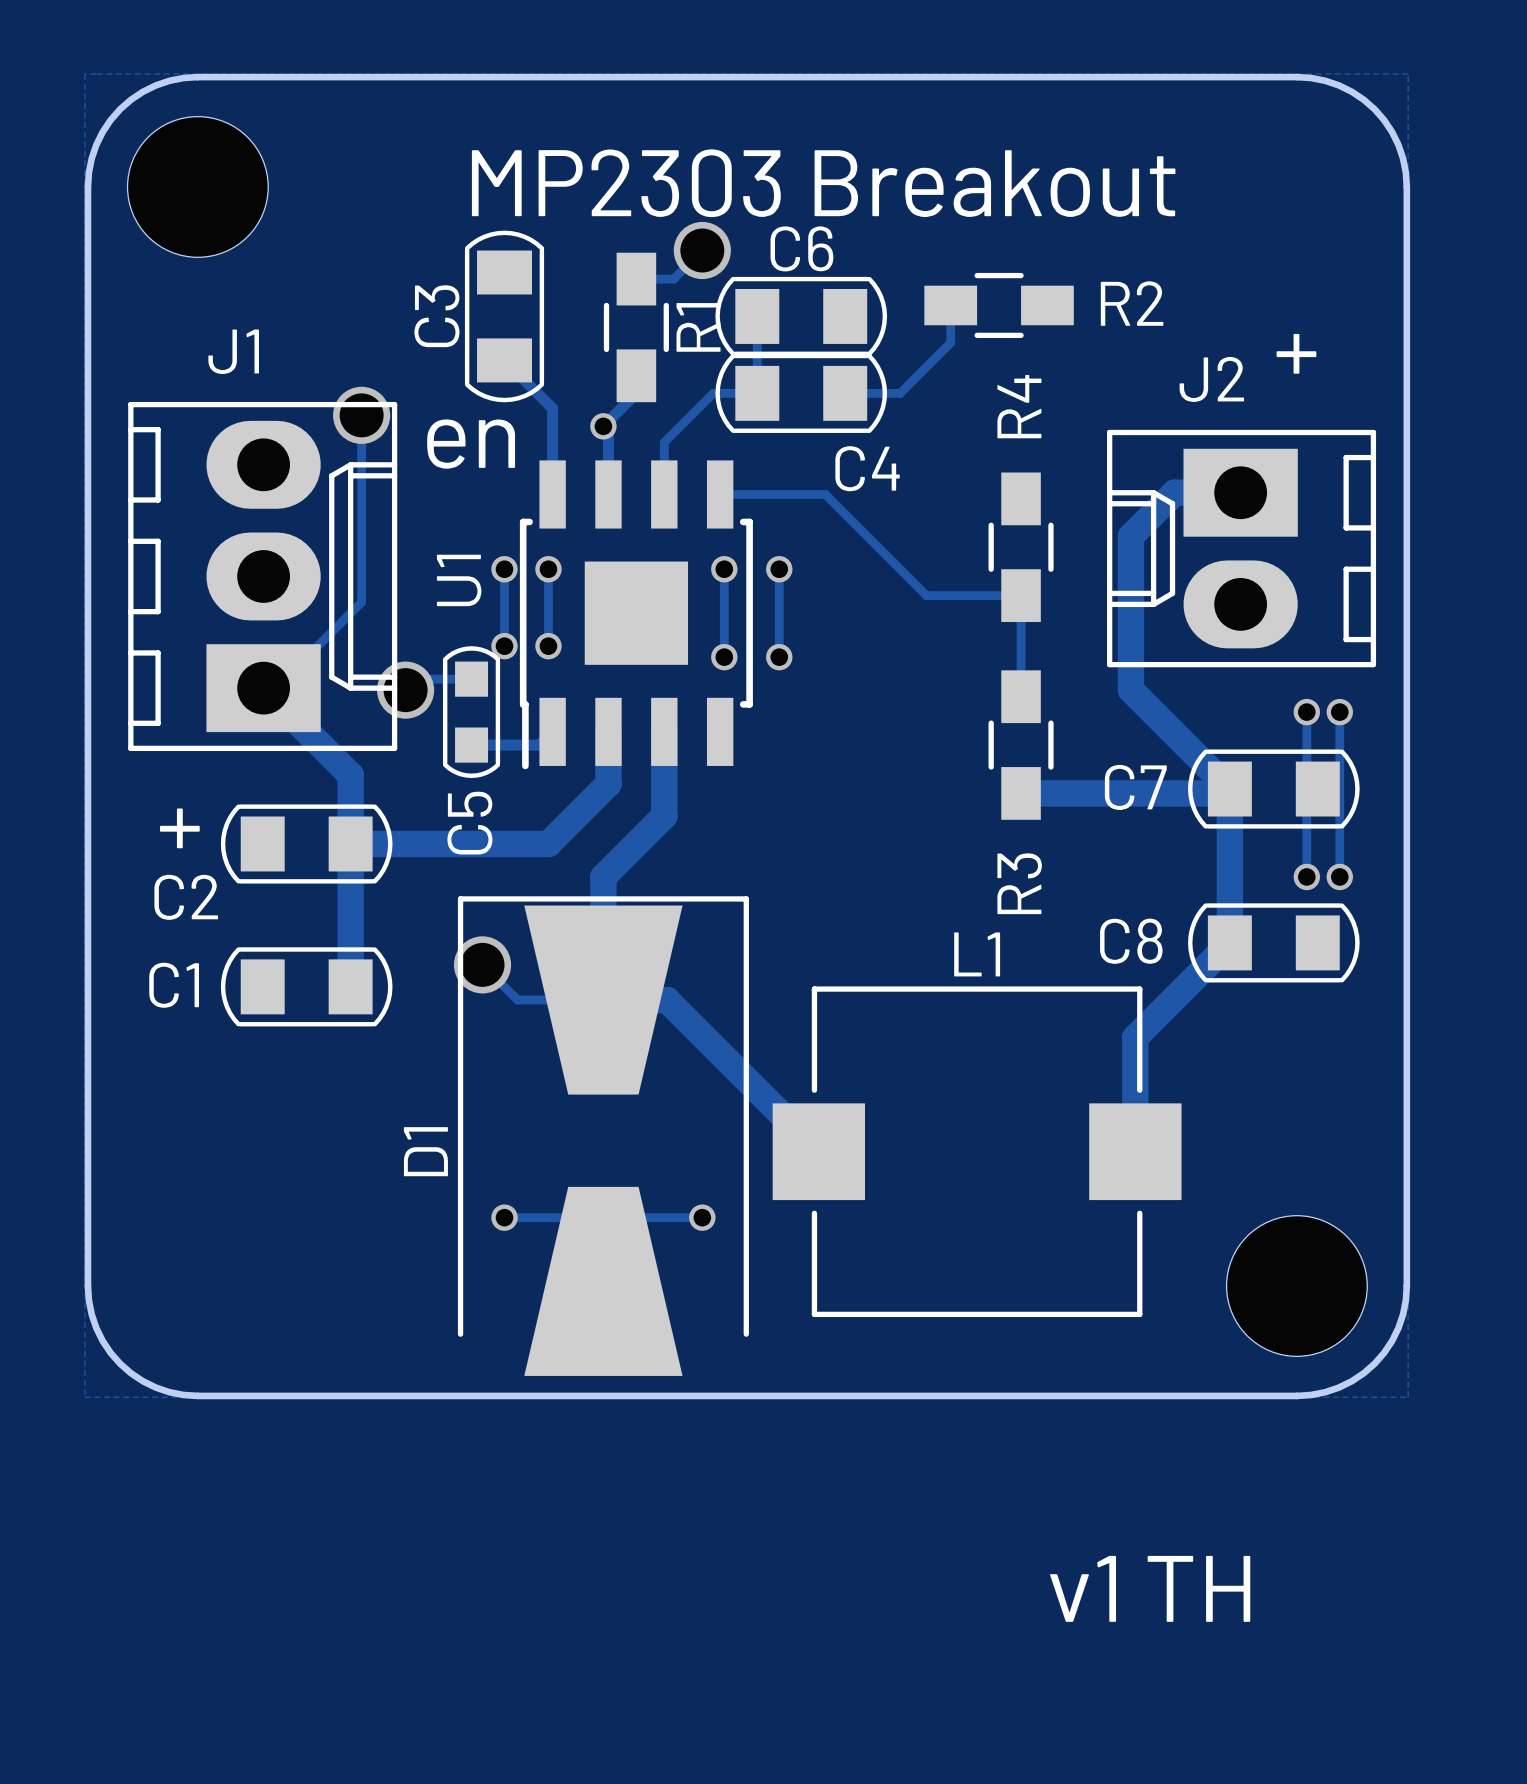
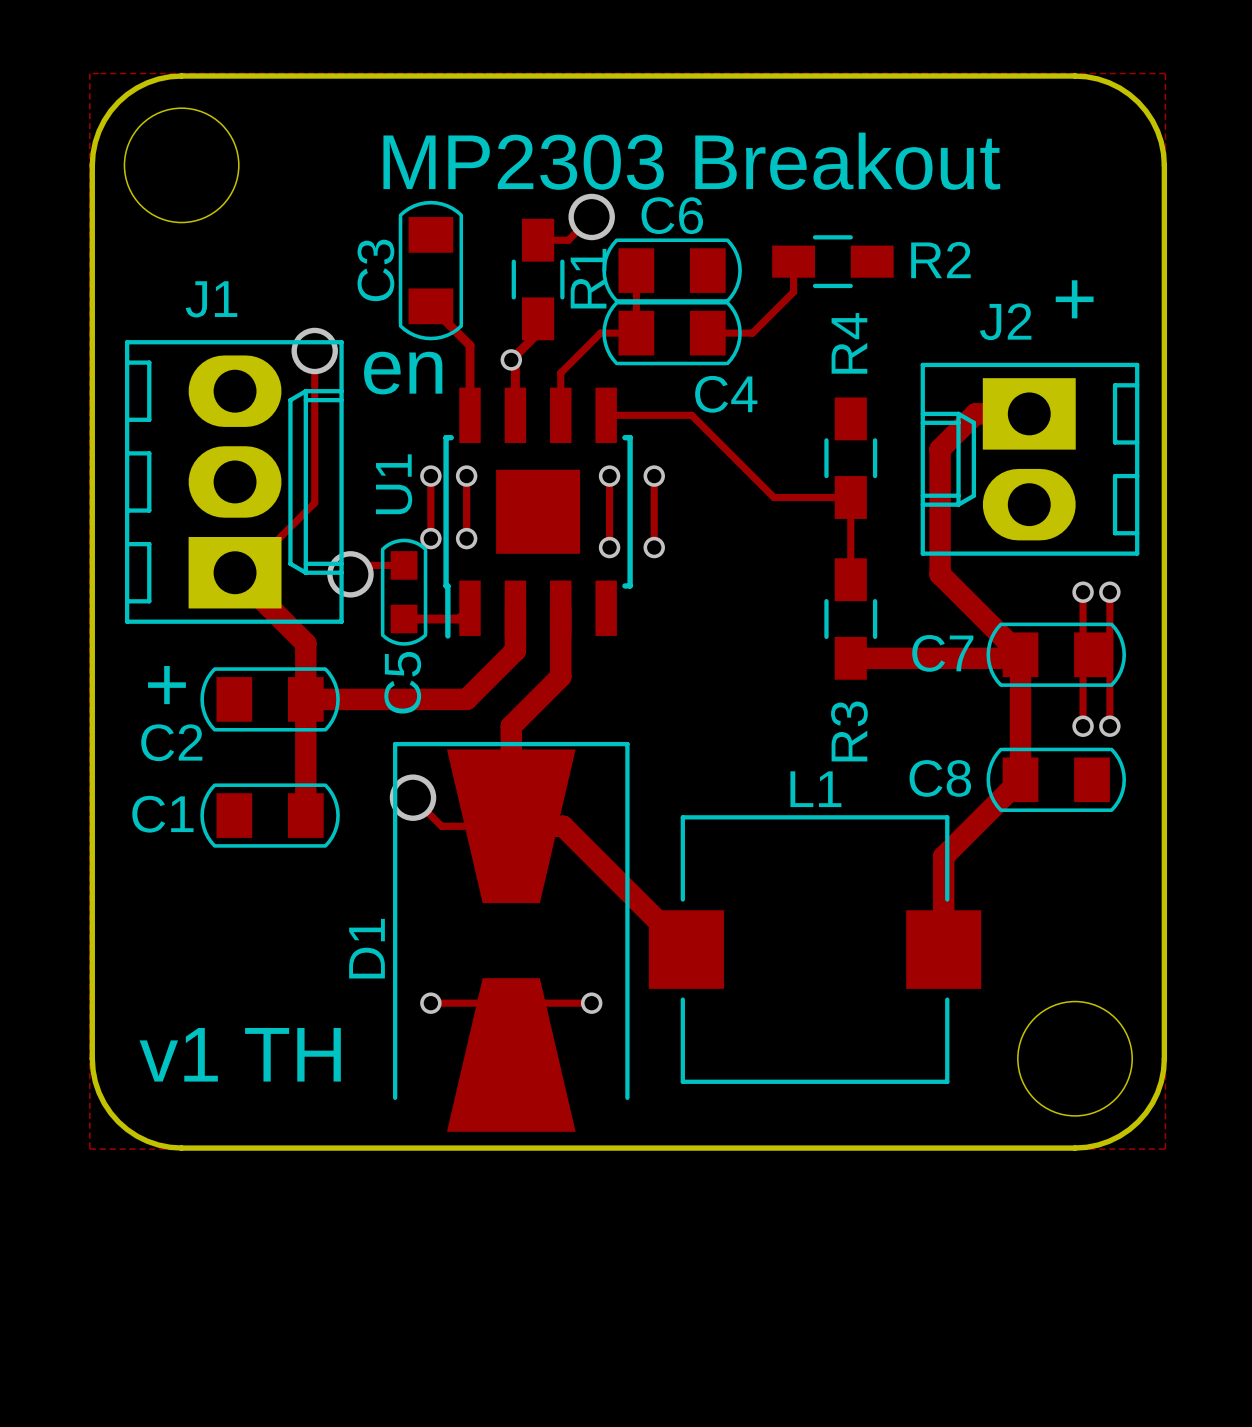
text position: v1 TH (1150, 1588) -> v1 TH (240, 1054)

